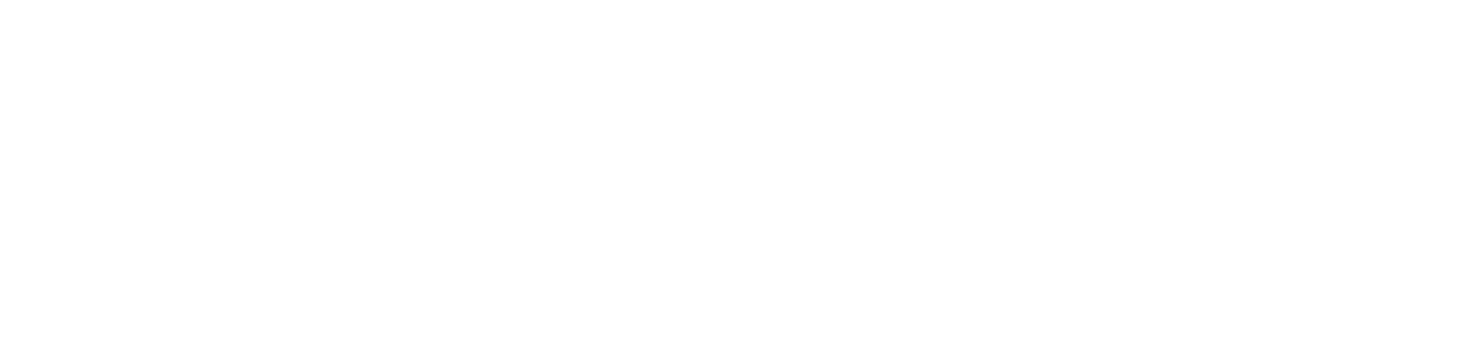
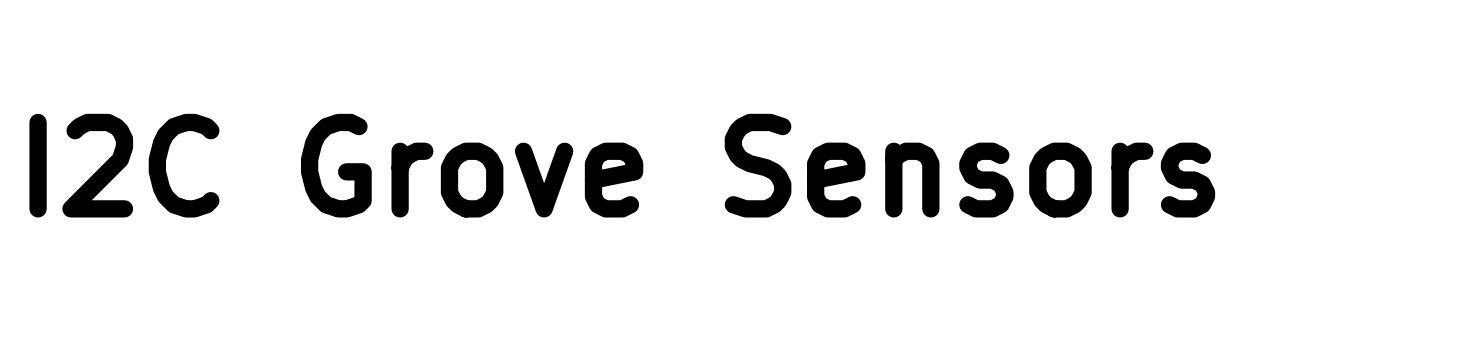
text: none -> I2C Grove Sensors (622, 165)

